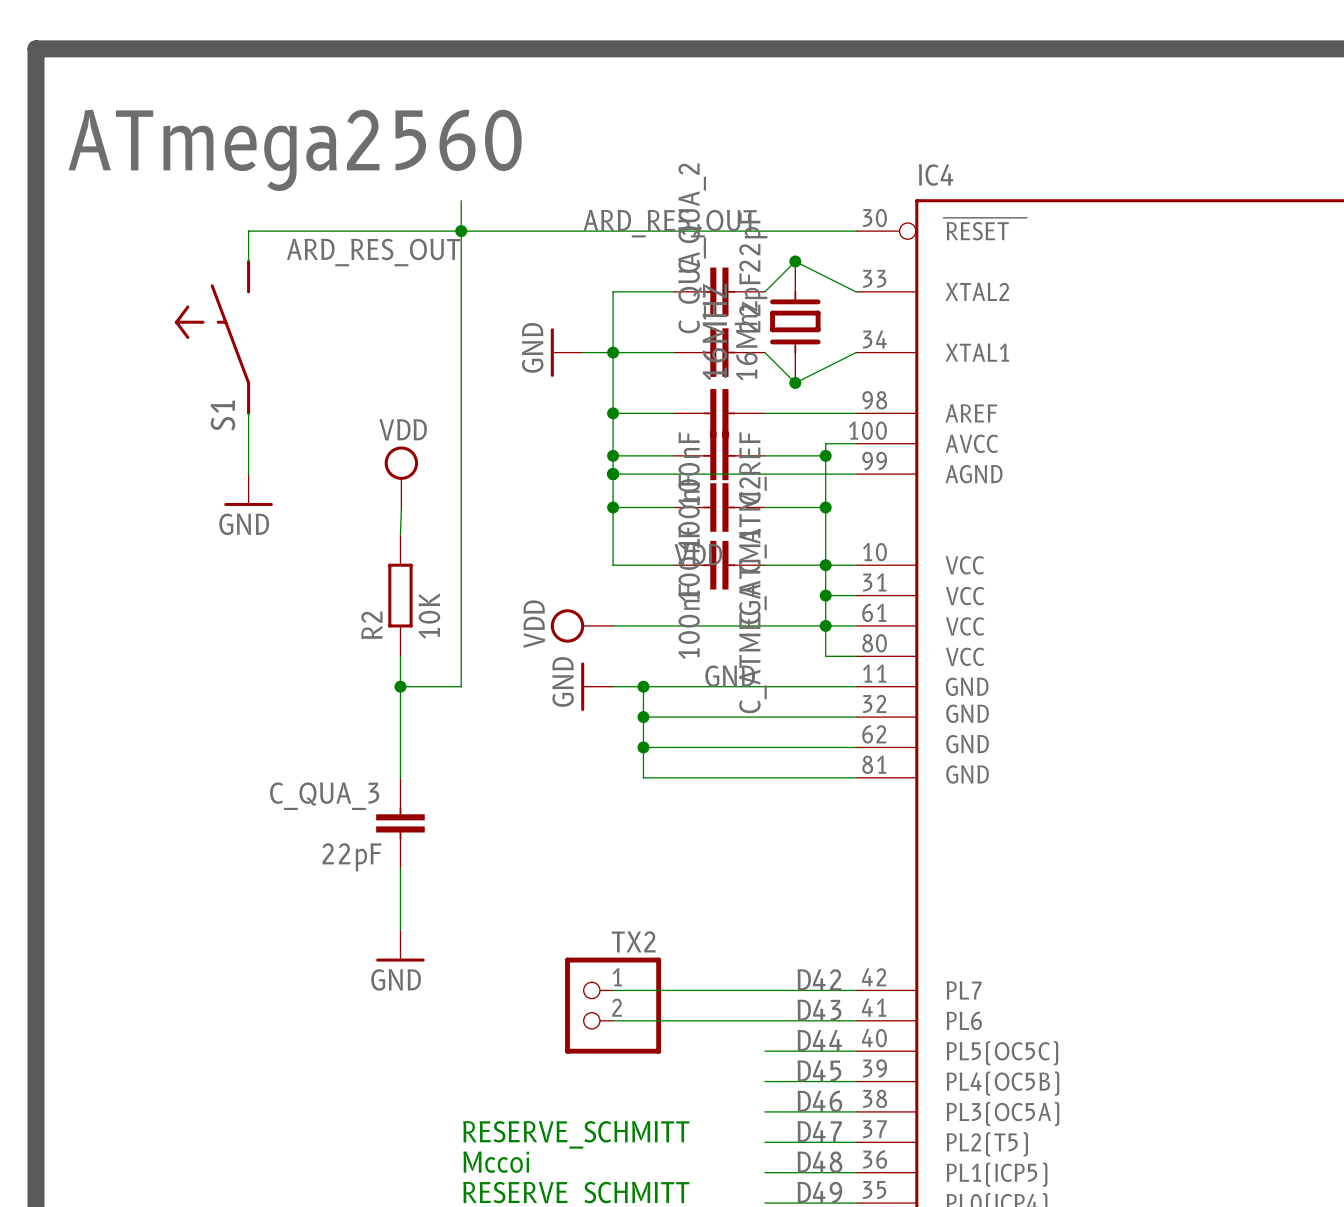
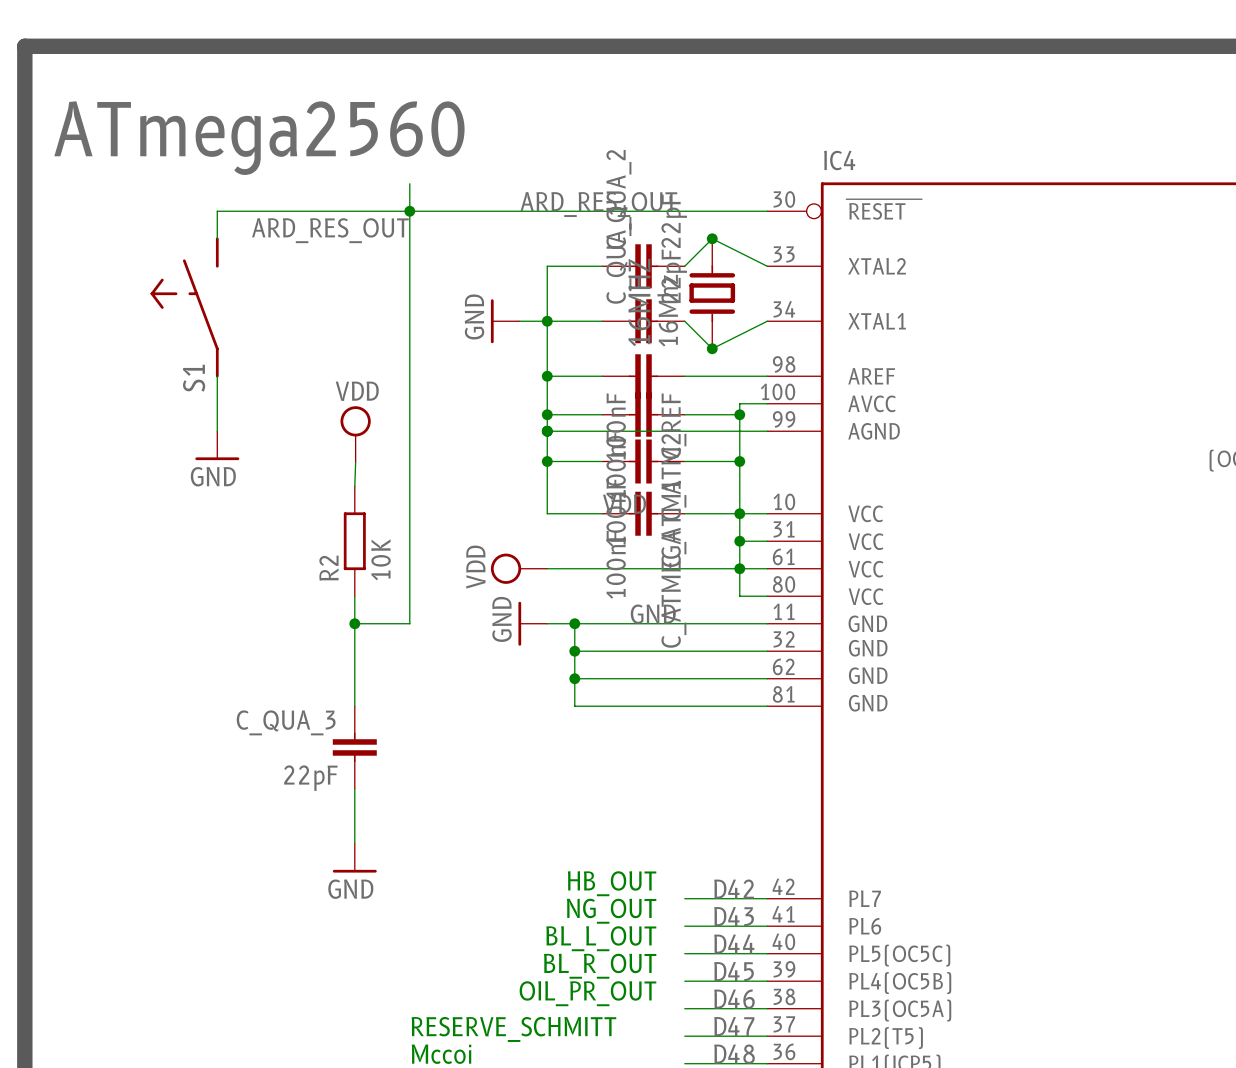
text: none -> HB_OUT (612, 883)
wire: (613, 990) (764, 990) -> none
text: none -> NG_OUT (611, 911)
TX2: (613, 1005) -> none
wire: (613, 1020) (764, 1020) -> none
text: none -> BL_L_OUT (601, 938)
text: none -> BL_R_OUT (600, 966)
text: none -> OIL_PR_OUT (587, 993)

